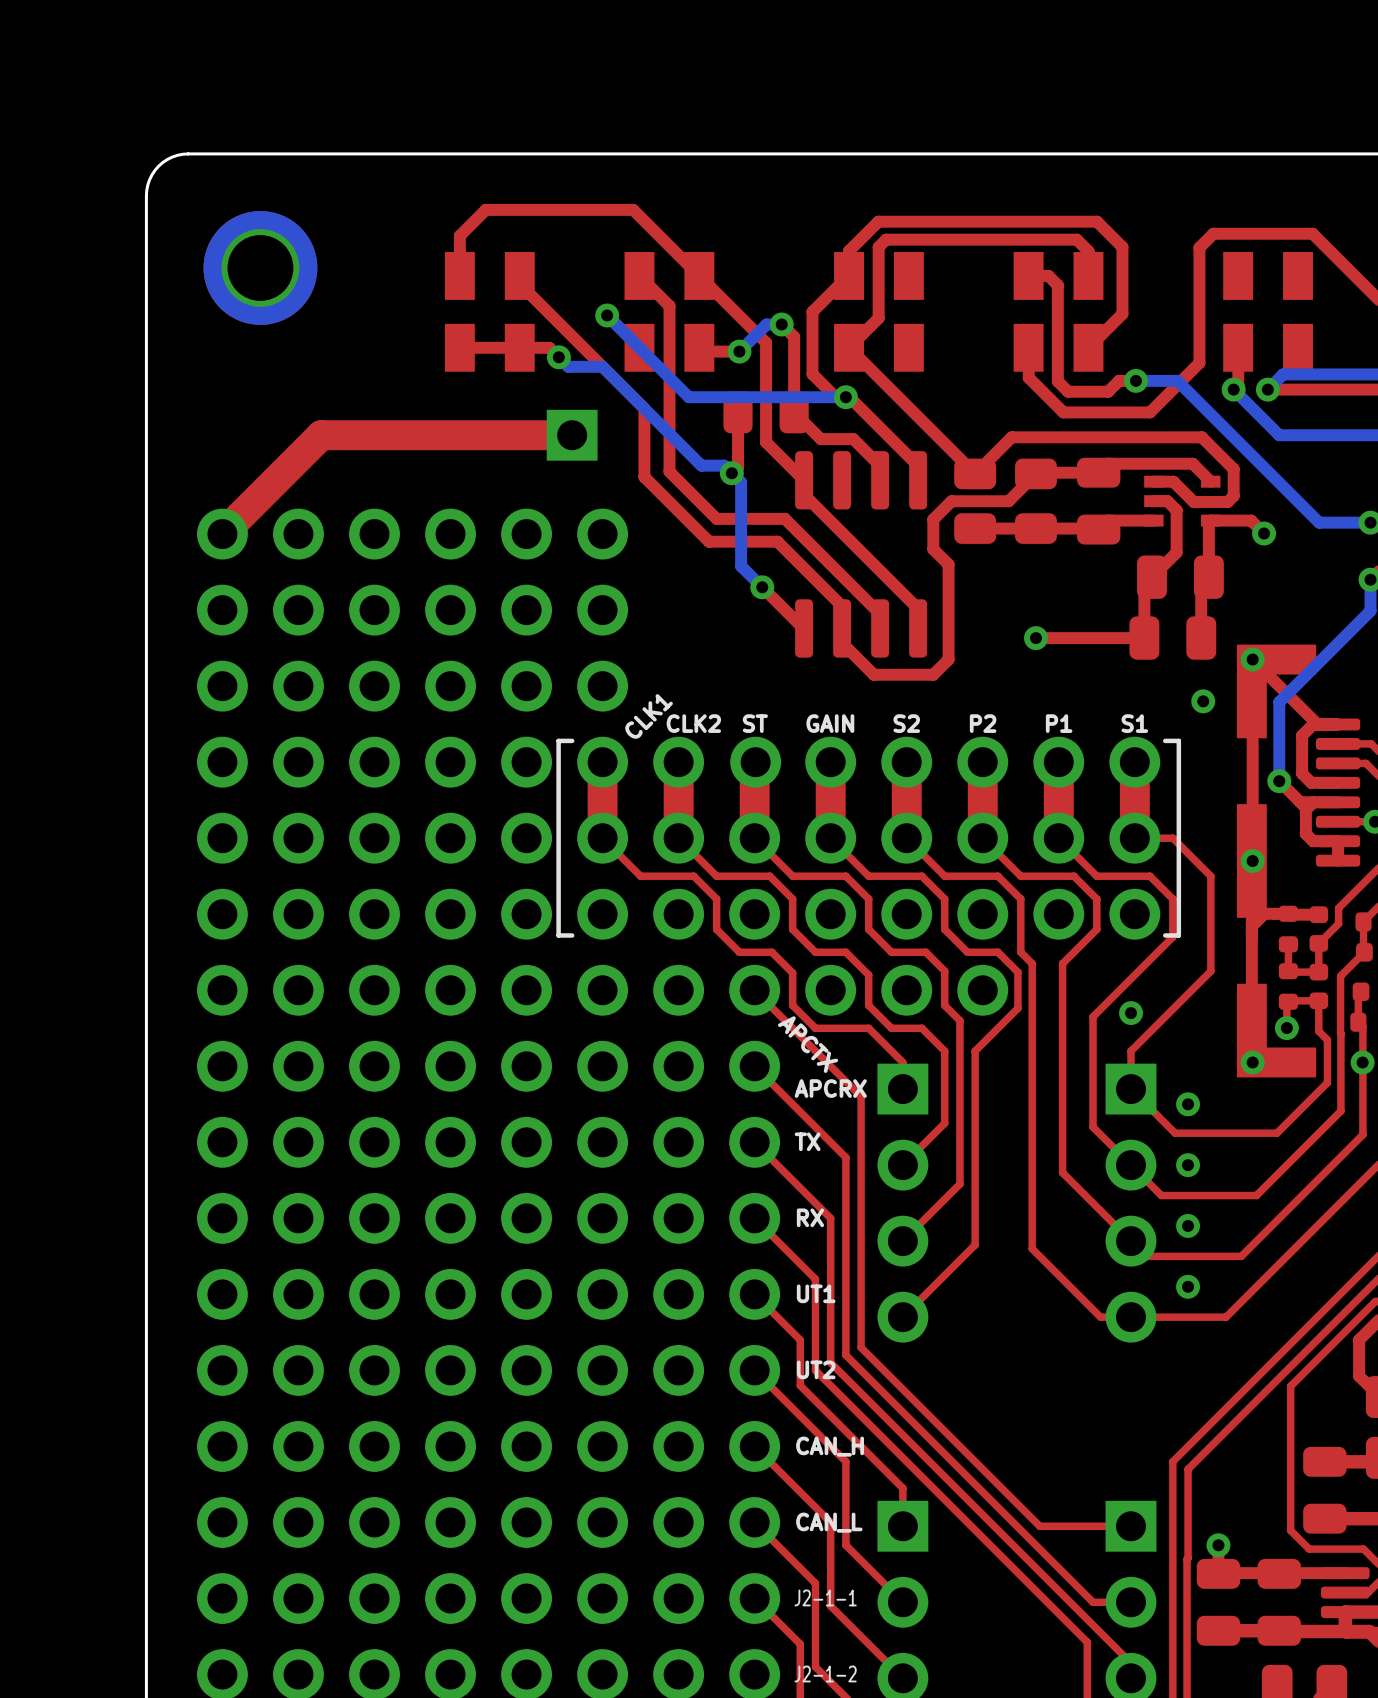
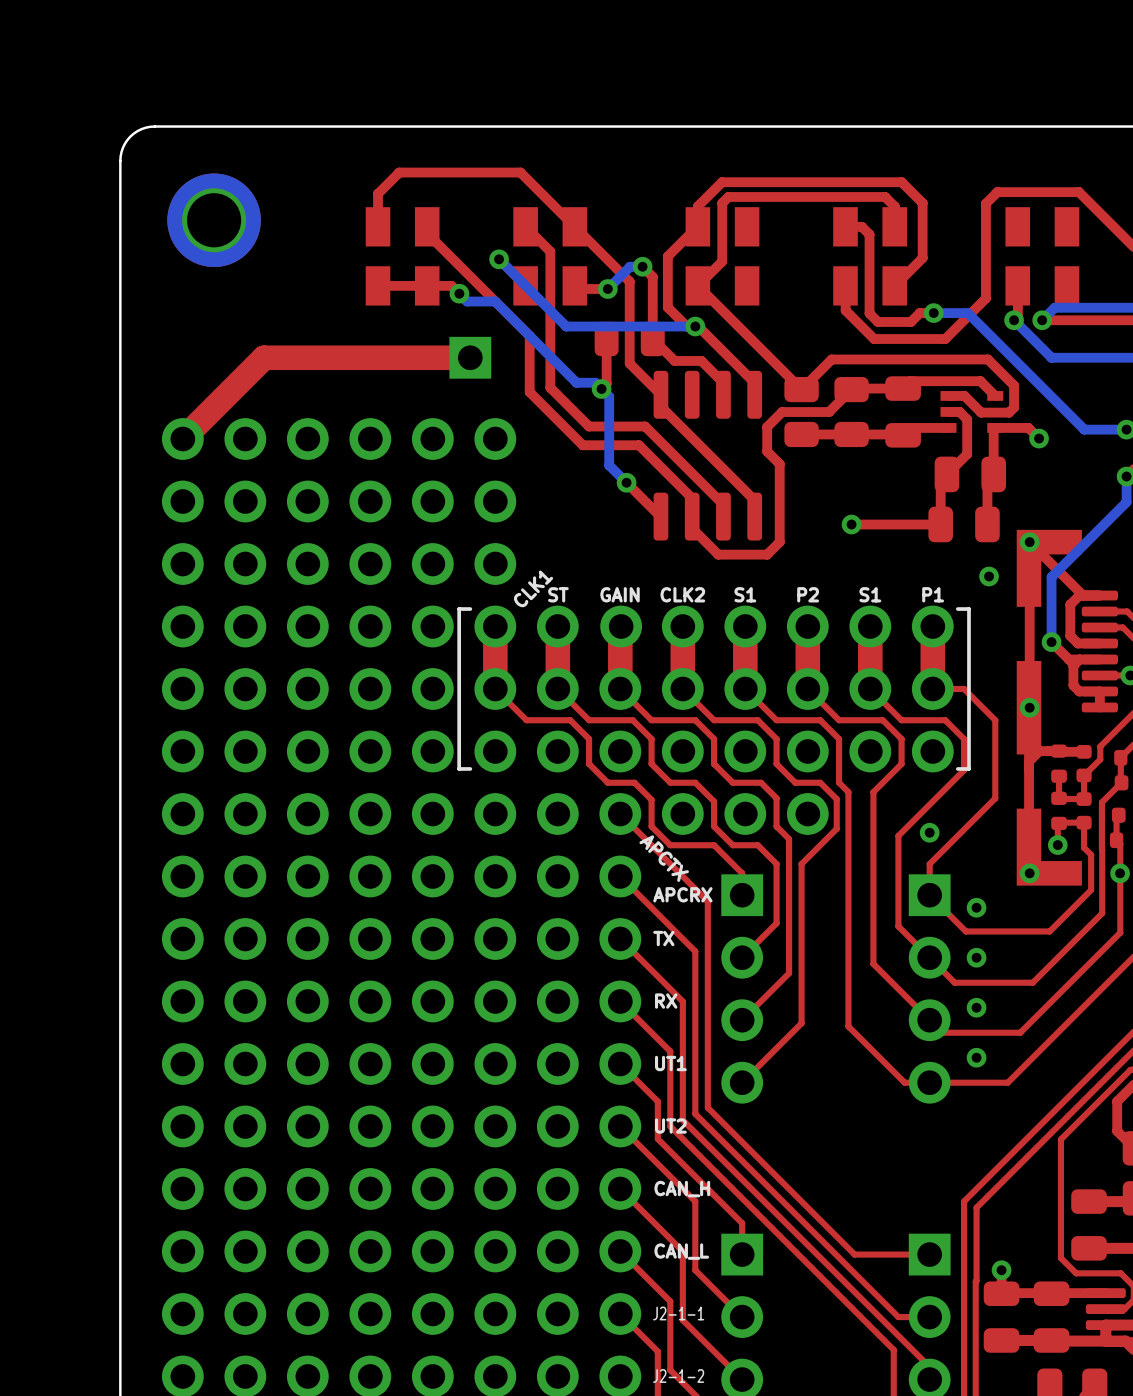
text: CLK2 (693, 723) -> ST (558, 594)
text: ST (755, 723) -> GAIN (620, 594)
text: GAIN (830, 723) -> CLK2 (682, 594)
text: S2 (906, 723) -> S1 (745, 594)
text: P1 (1059, 723) -> S1 (870, 594)
text: S1 (1134, 723) -> P1 (933, 594)

